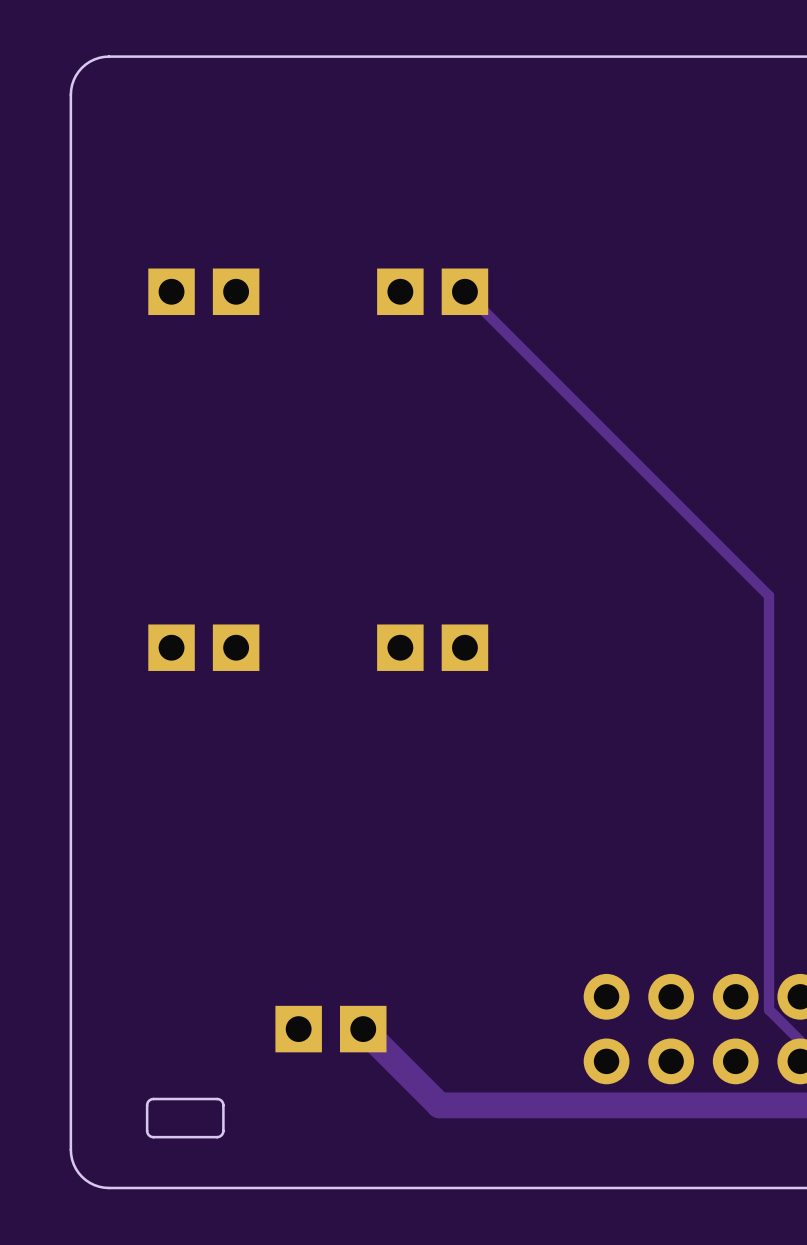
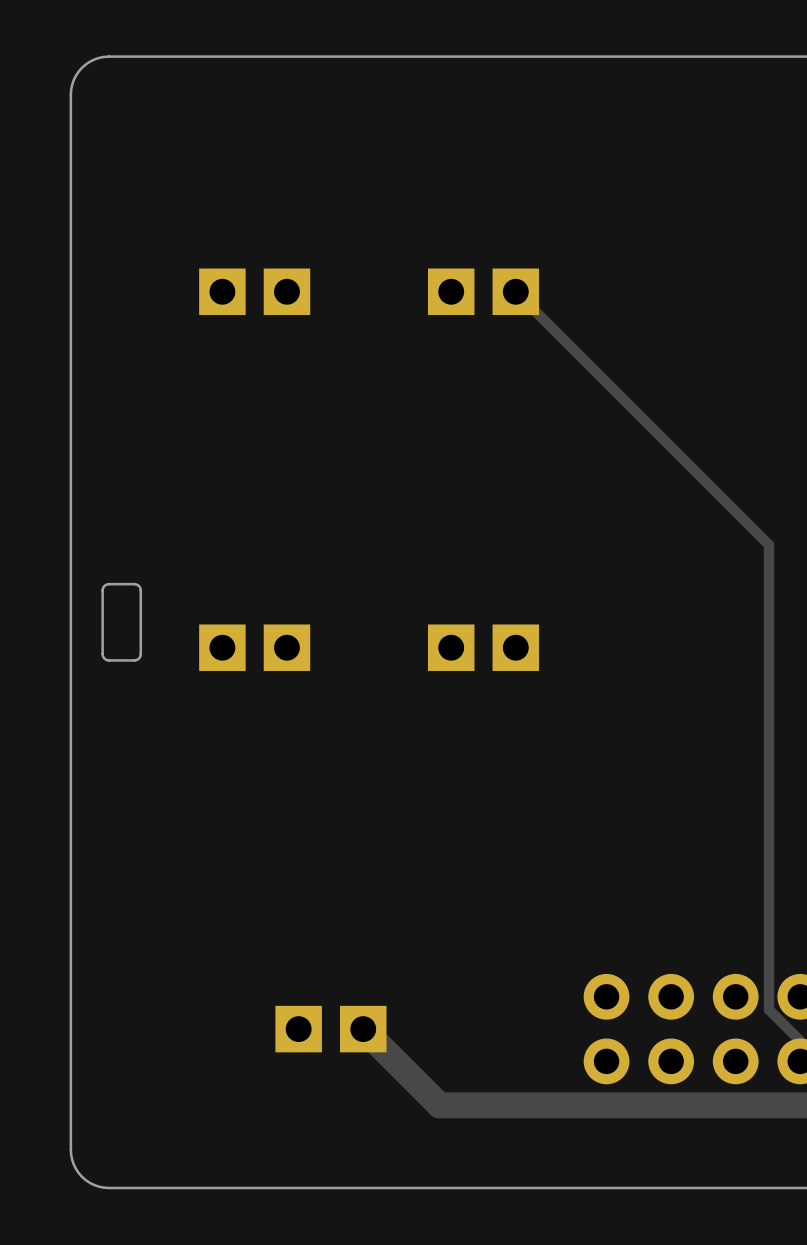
part position: (203, 291) -> (254, 291)
part position: (432, 291) -> (483, 291)
track: (464, 291) (769, 595) -> (515, 291) (769, 545) (769, 595)
board edge: none -> (134, 584) (108, 584) (103, 588) (102, 654) (106, 659) (135, 660) (140, 656) (140, 589) (138, 586) (134, 584)
part position: (203, 647) -> (254, 647)
part position: (432, 647) -> (483, 647)
board edge: (217, 1099) (150, 1099) (147, 1104) (147, 1133) (153, 1137) (220, 1136) (223, 1131) (223, 1104) (221, 1100) (217, 1099) -> none

